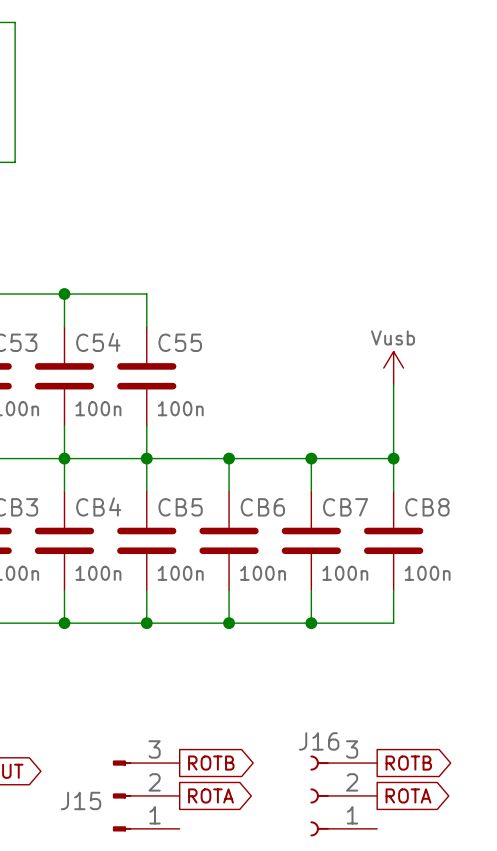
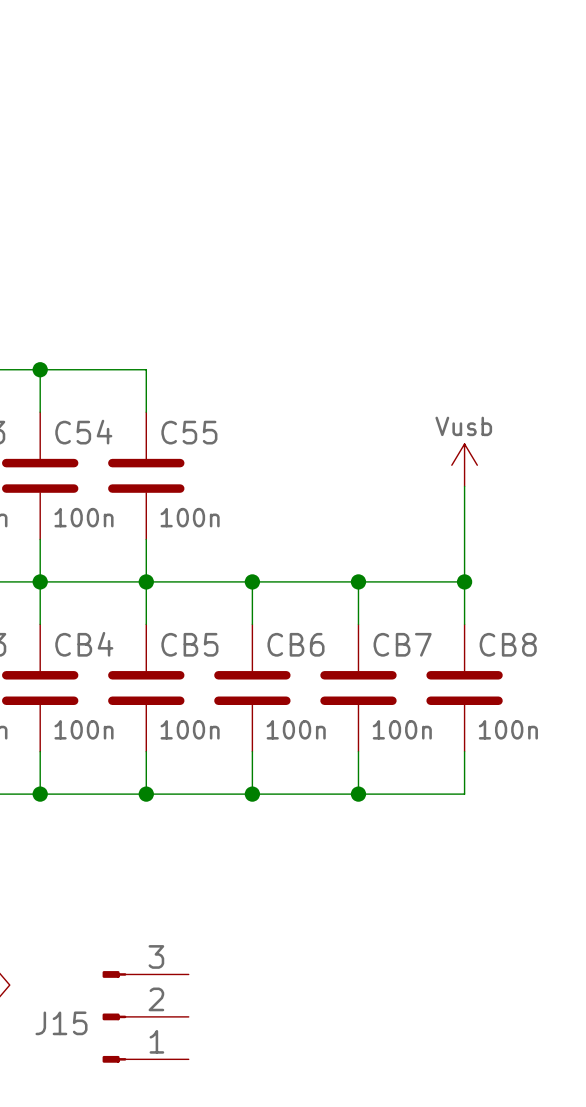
global label: ROTB (211, 763) -> none
global label: ROTB (408, 763) -> none
global label: ROTA (211, 795) -> none
J16: (343, 795) -> none
global label: ROTA (408, 795) -> none

